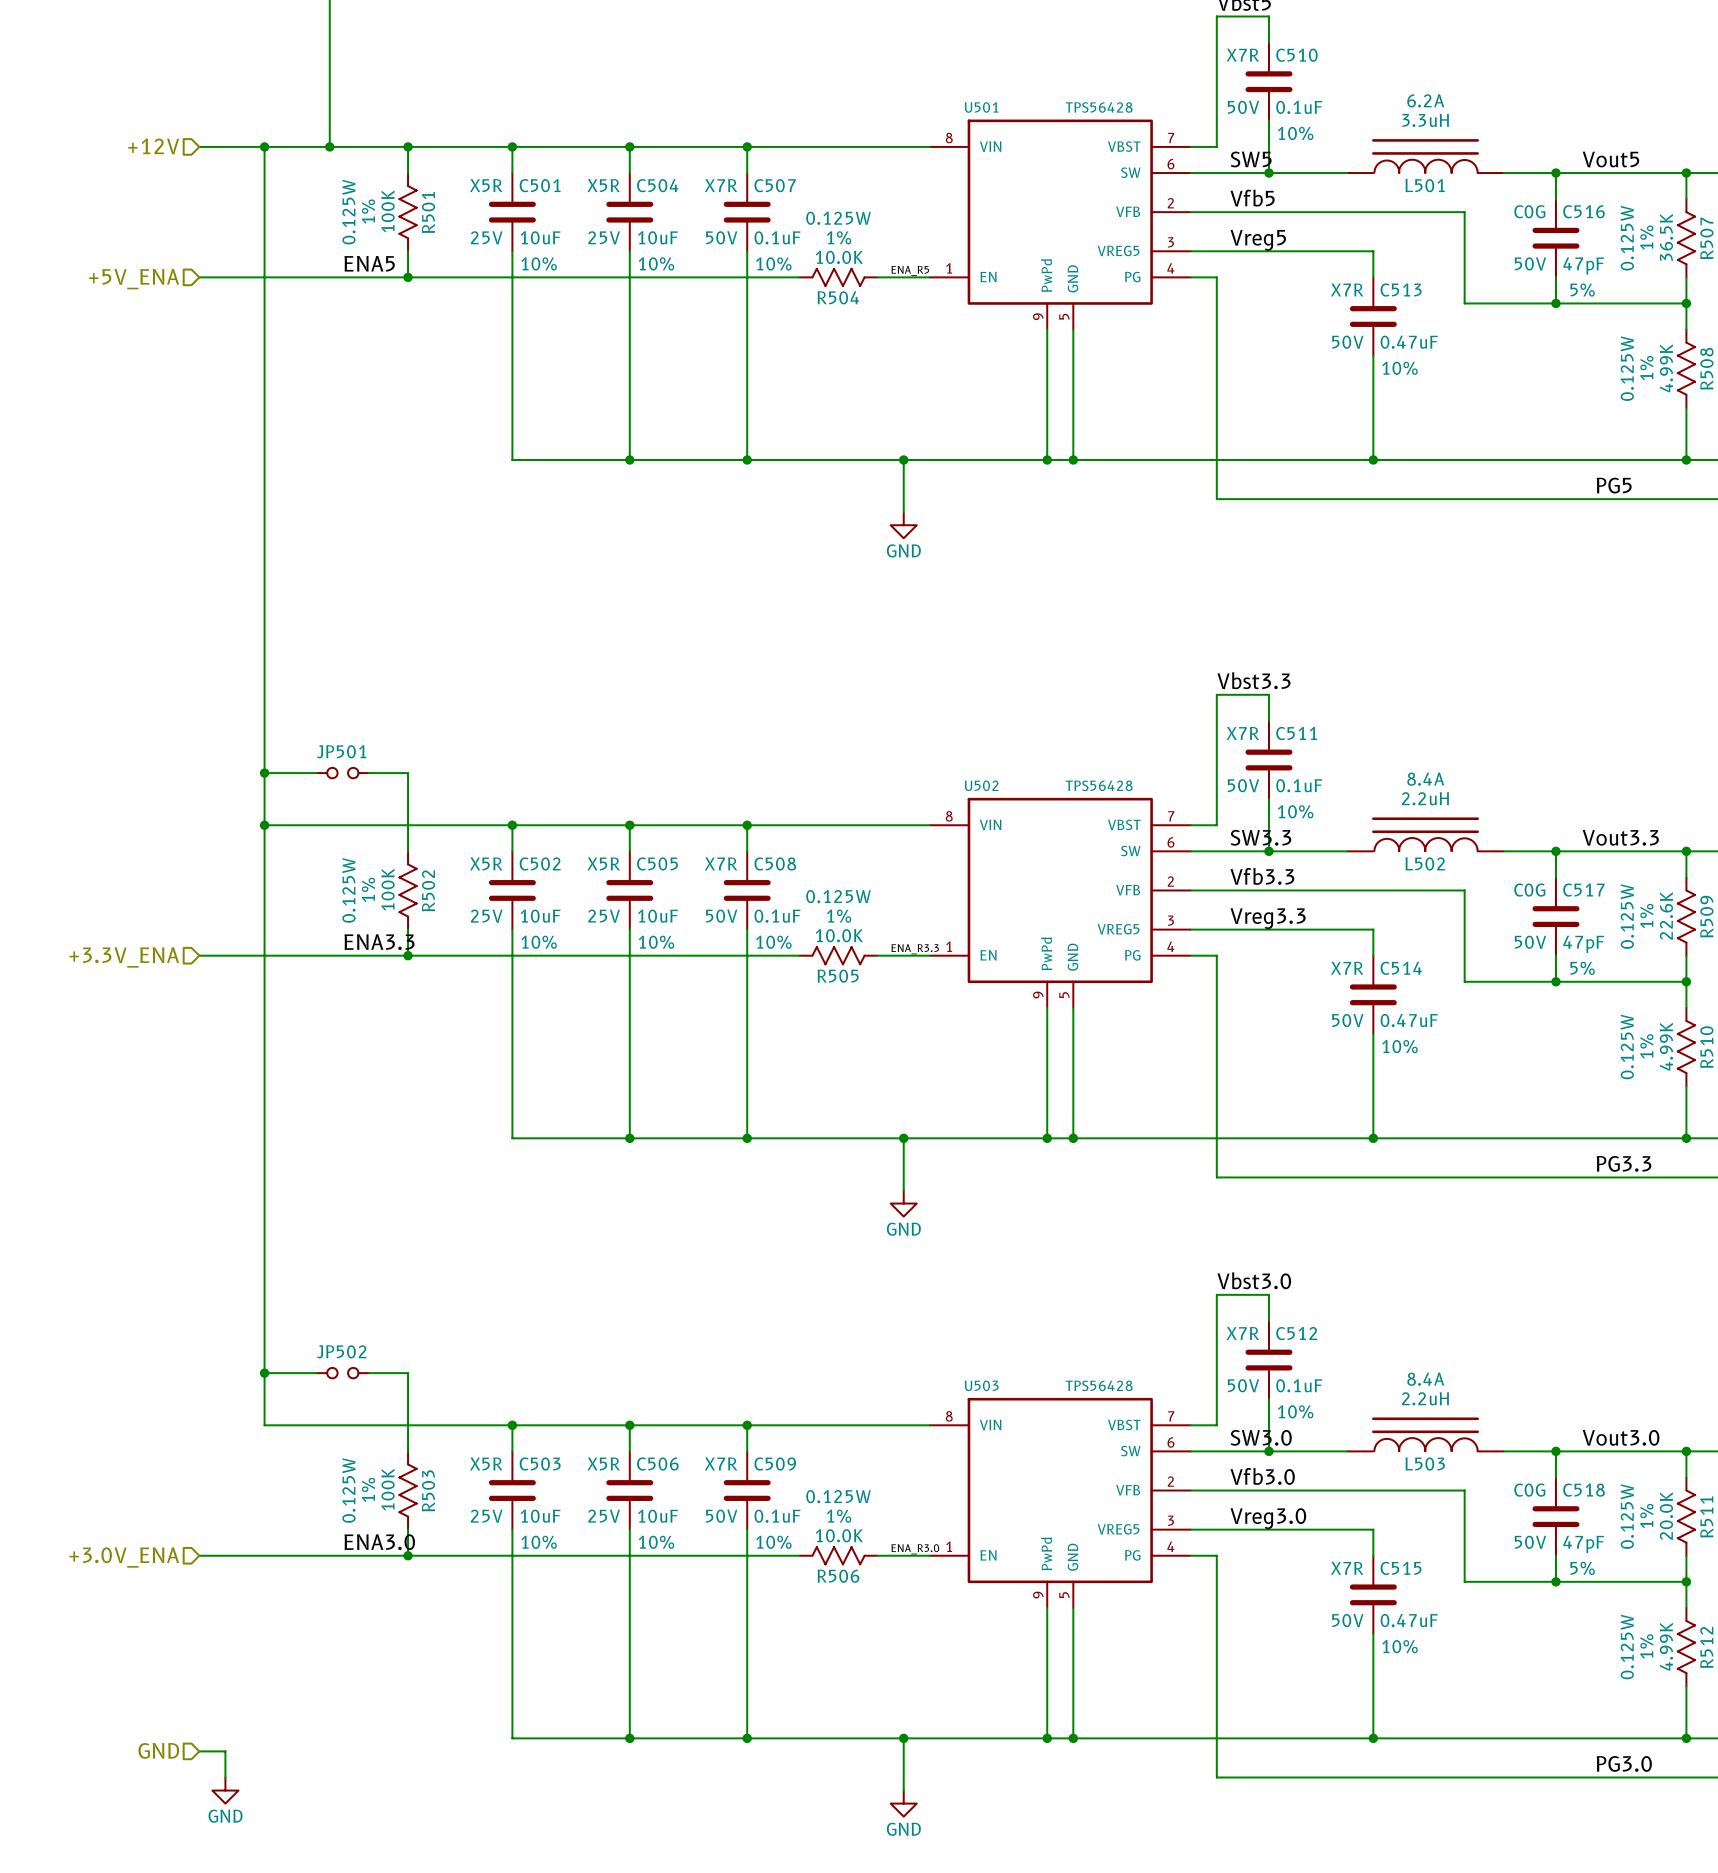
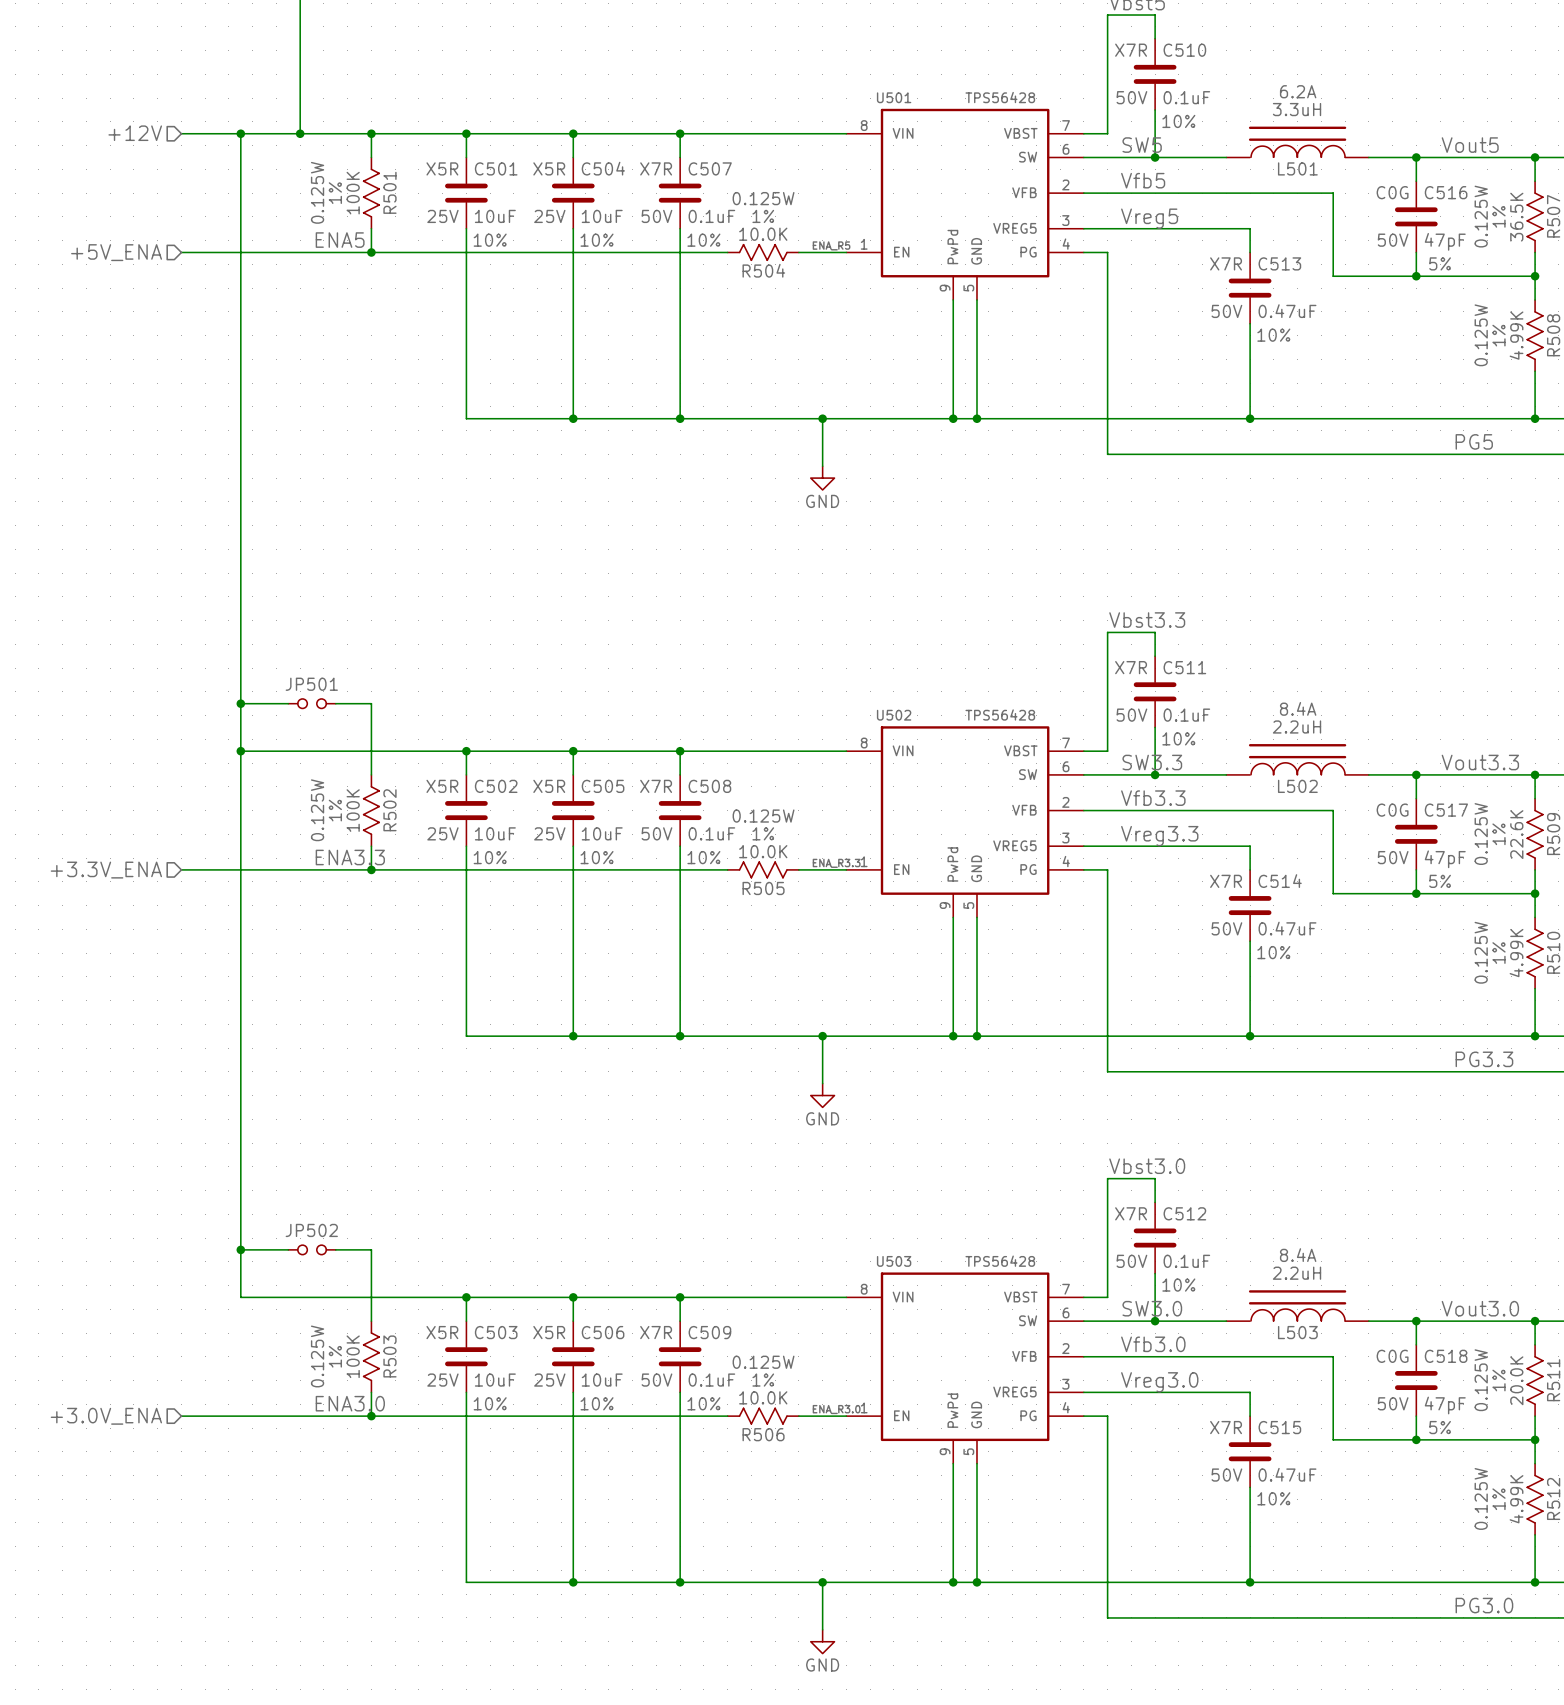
hierarchical label: GND (158, 1750) -> none
wire: (199, 1751) (225, 1751) (225, 1777) -> none
power symbol: GND (225, 1790) -> none

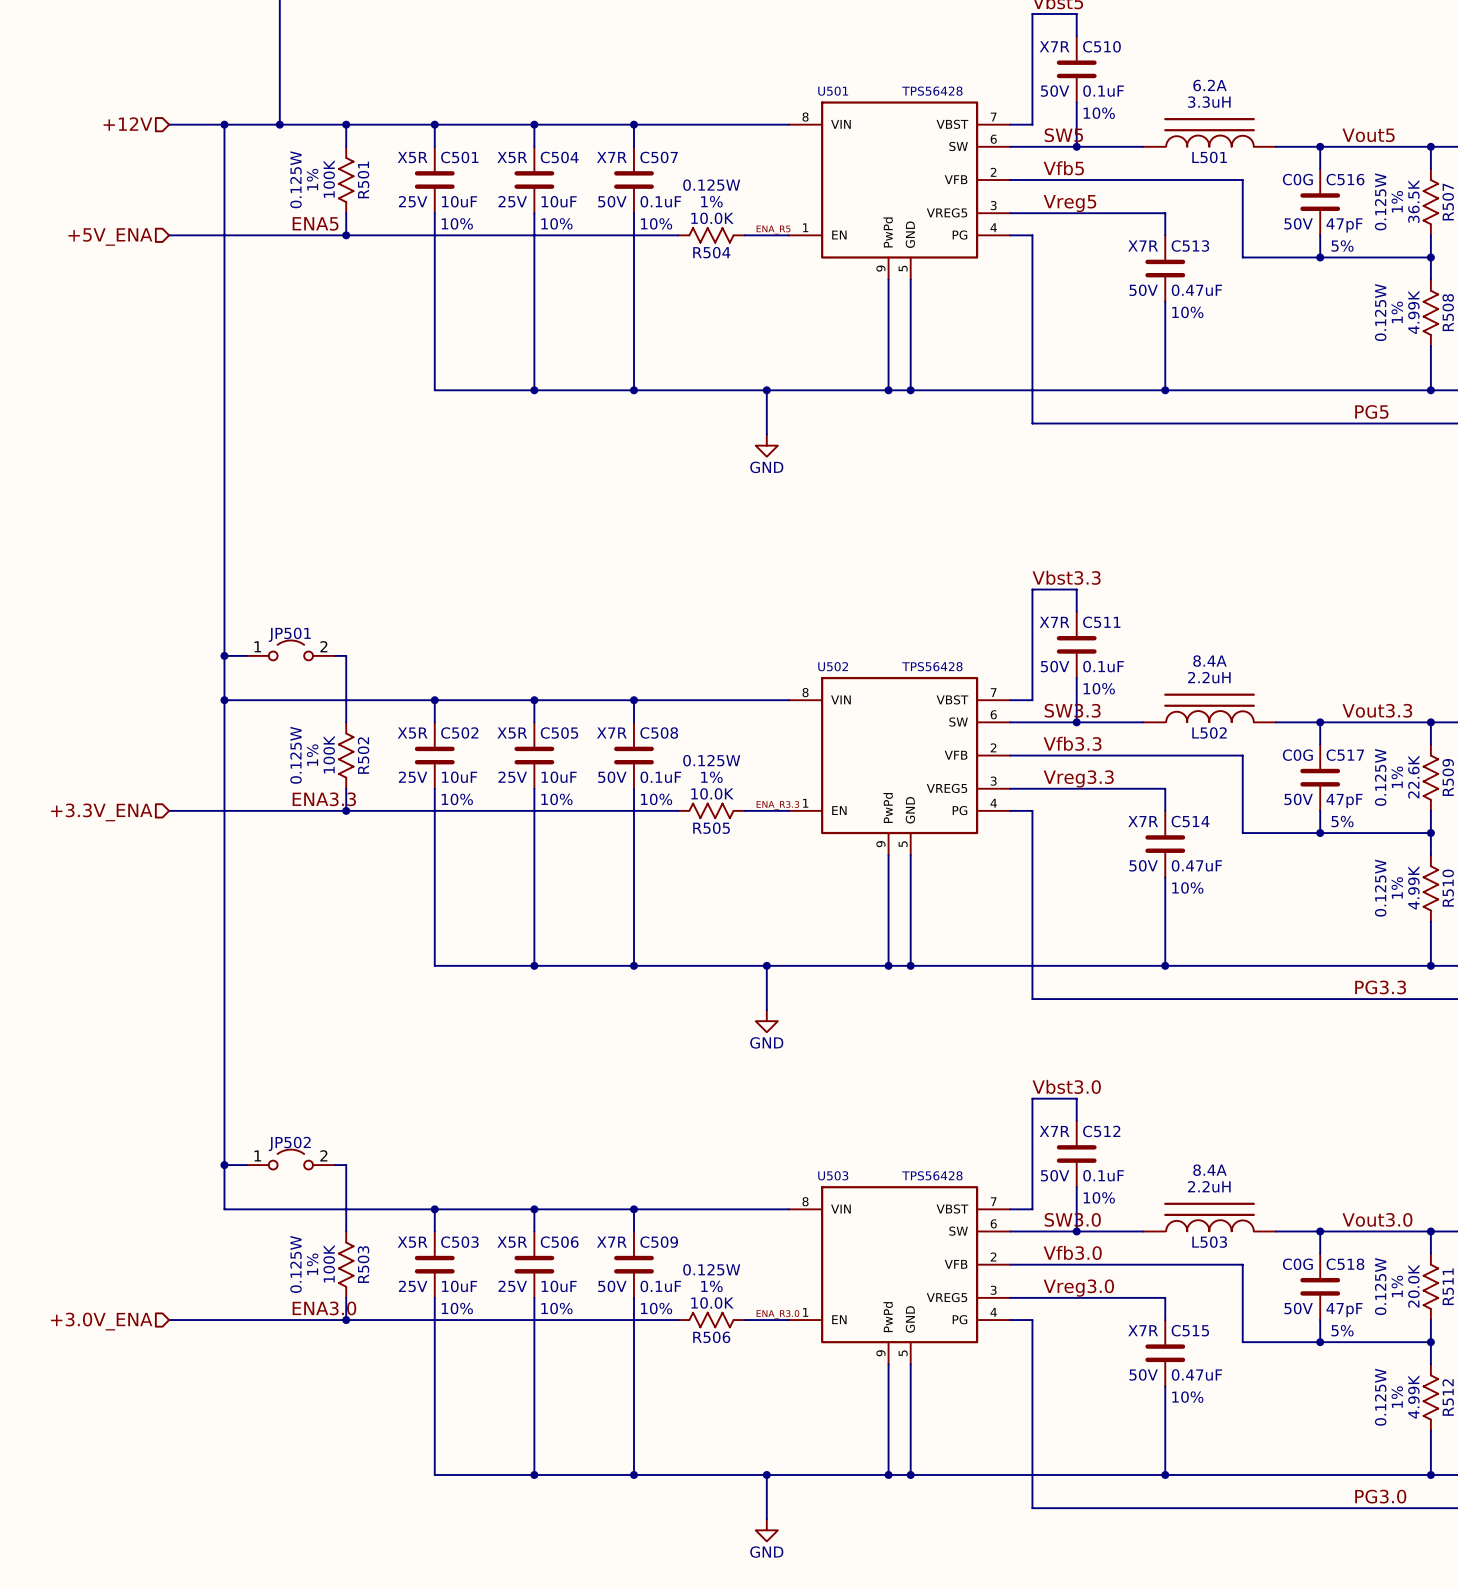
JP501 symbol: [288, 698, 336, 709] -> [246, 640, 336, 661]
JP502 symbol: [288, 1245, 336, 1255] -> [246, 1149, 336, 1170]

